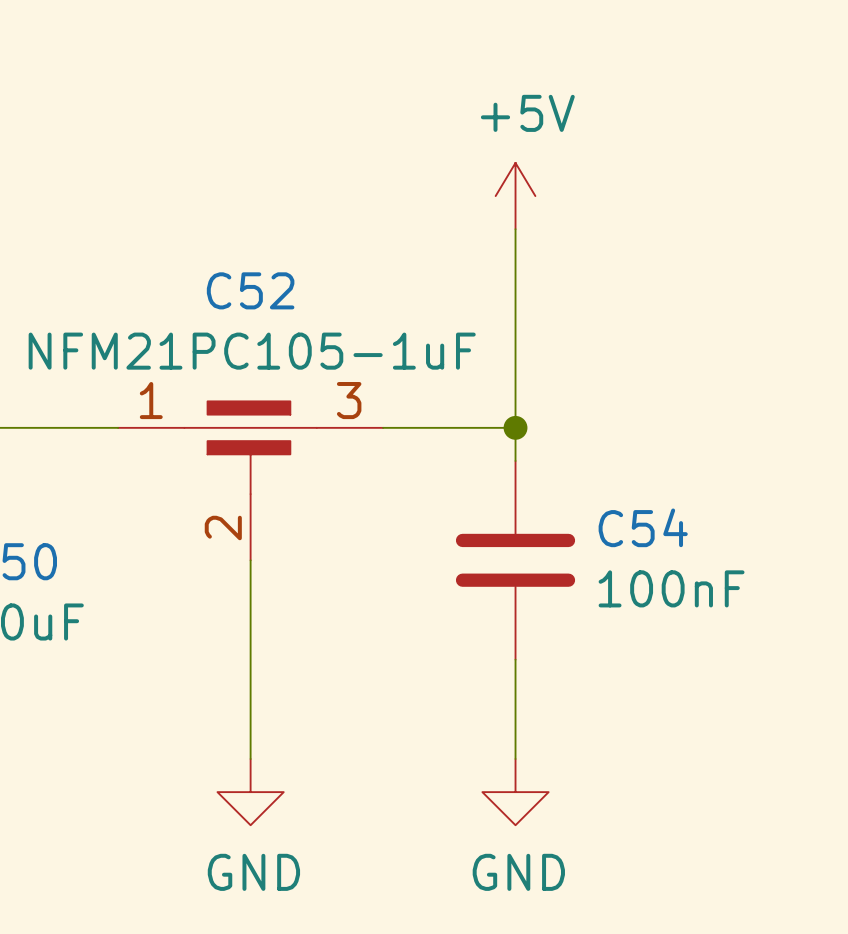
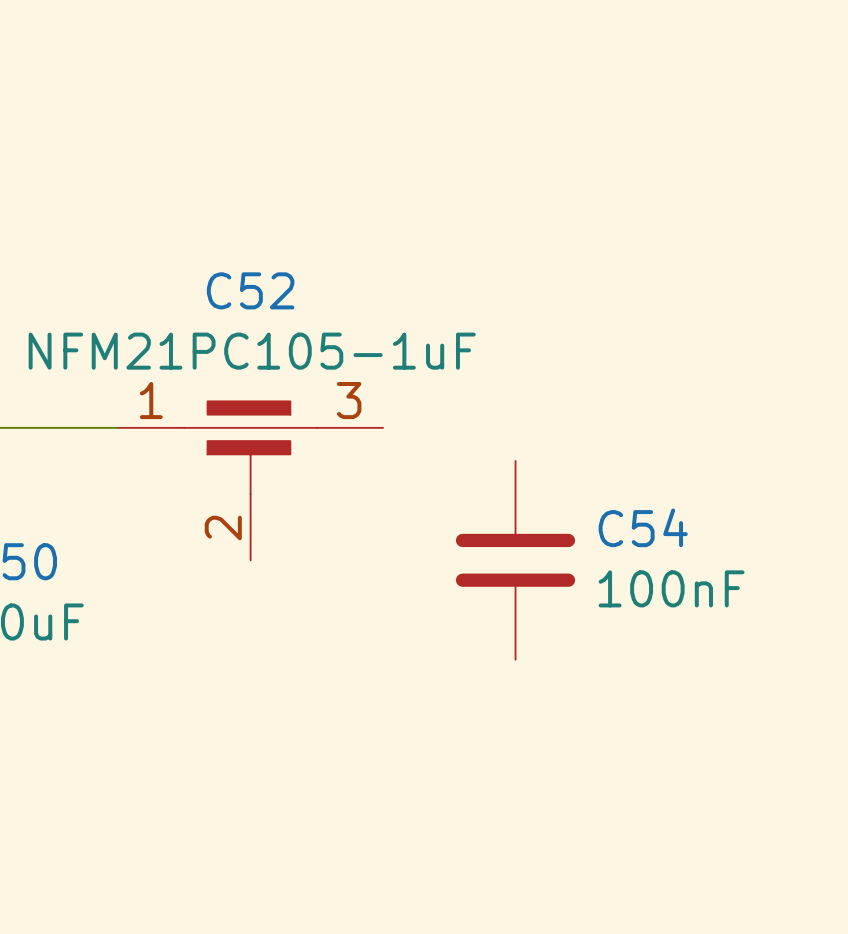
power symbol: +5V (515, 196) -> none
wire: (515, 229) (515, 460) -> none
wire: (383, 427) (515, 427) -> none
junction: (515, 427) -> none
wire: (250, 560) (250, 759) -> none
wire: (515, 659) (515, 759) -> none
power symbol: GND (250, 792) -> none
power symbol: GND (515, 792) -> none

